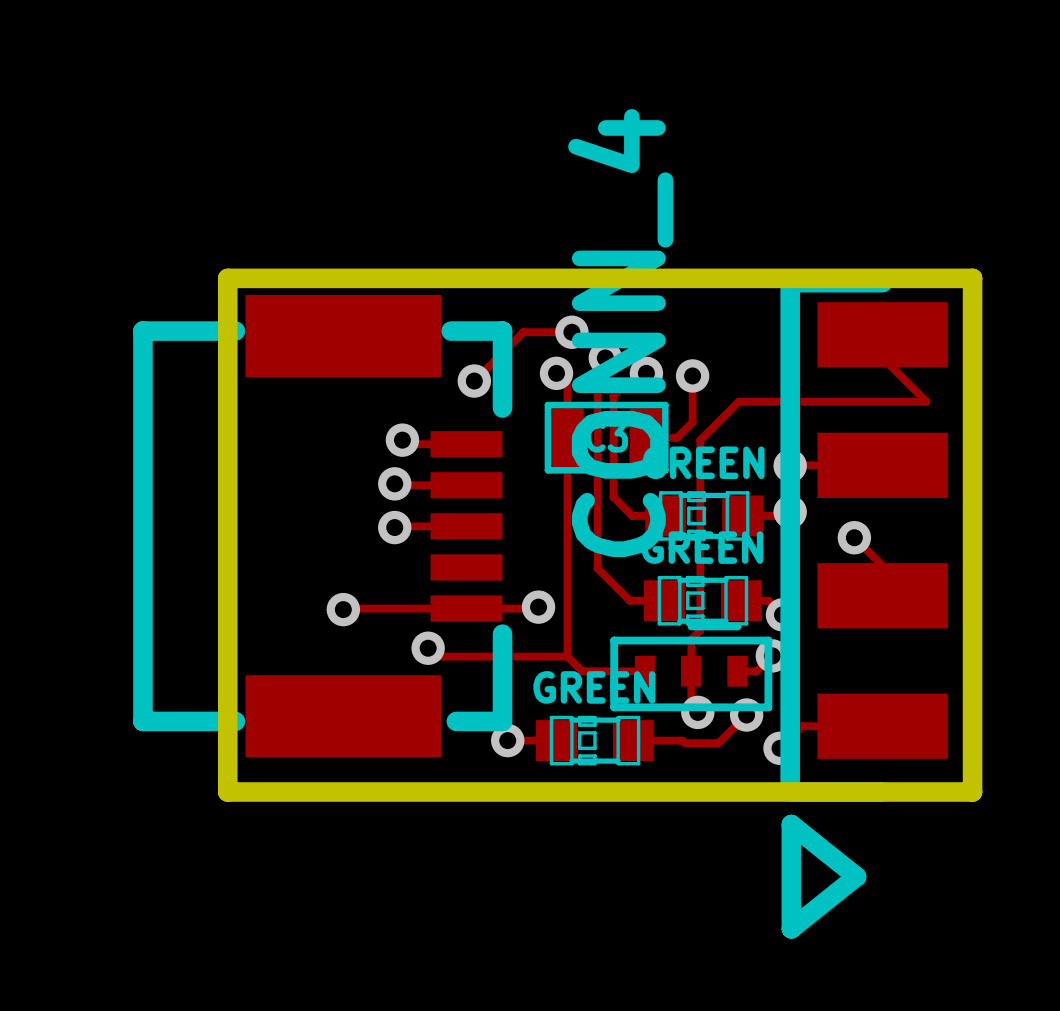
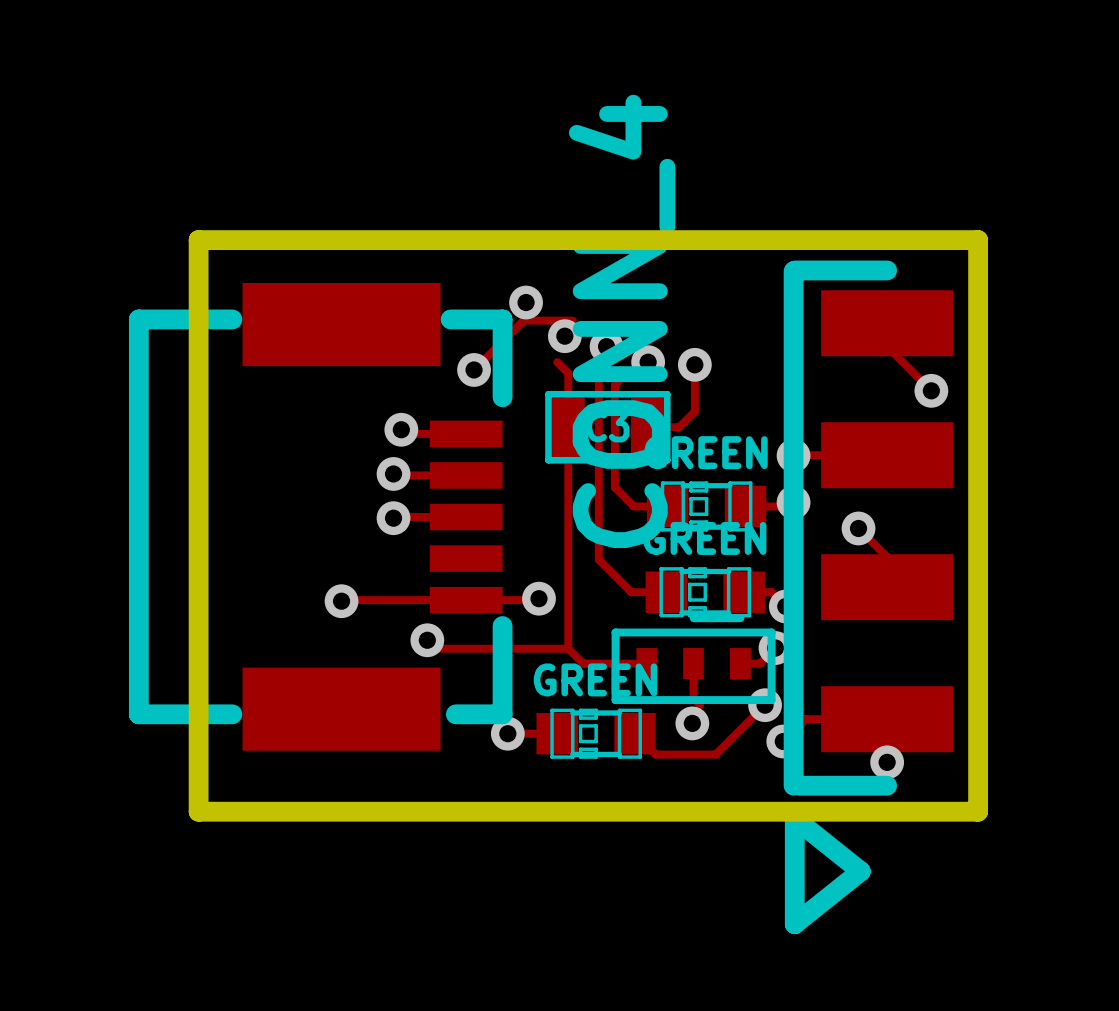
board edge: (972, 278) (227, 278) (227, 792) (972, 792) -> (978, 266) (978, 240) (198, 240) (198, 811) (978, 811) (978, 785)
via: none -> (526, 302)
via: (571, 332) -> none
via: none -> (564, 336)
via: (556, 373) -> none
track: (926, 401) (738, 401) (700, 440) (700, 630) (691, 639) (691, 671) -> none
via: none -> (931, 390)
via position: (697, 712) -> (692, 723)
track: (746, 715) (718, 743) (633, 740) -> (765, 705) (715, 754) (655, 754) (635, 733)
via position: (746, 715) -> (765, 705)
via: none -> (887, 762)

